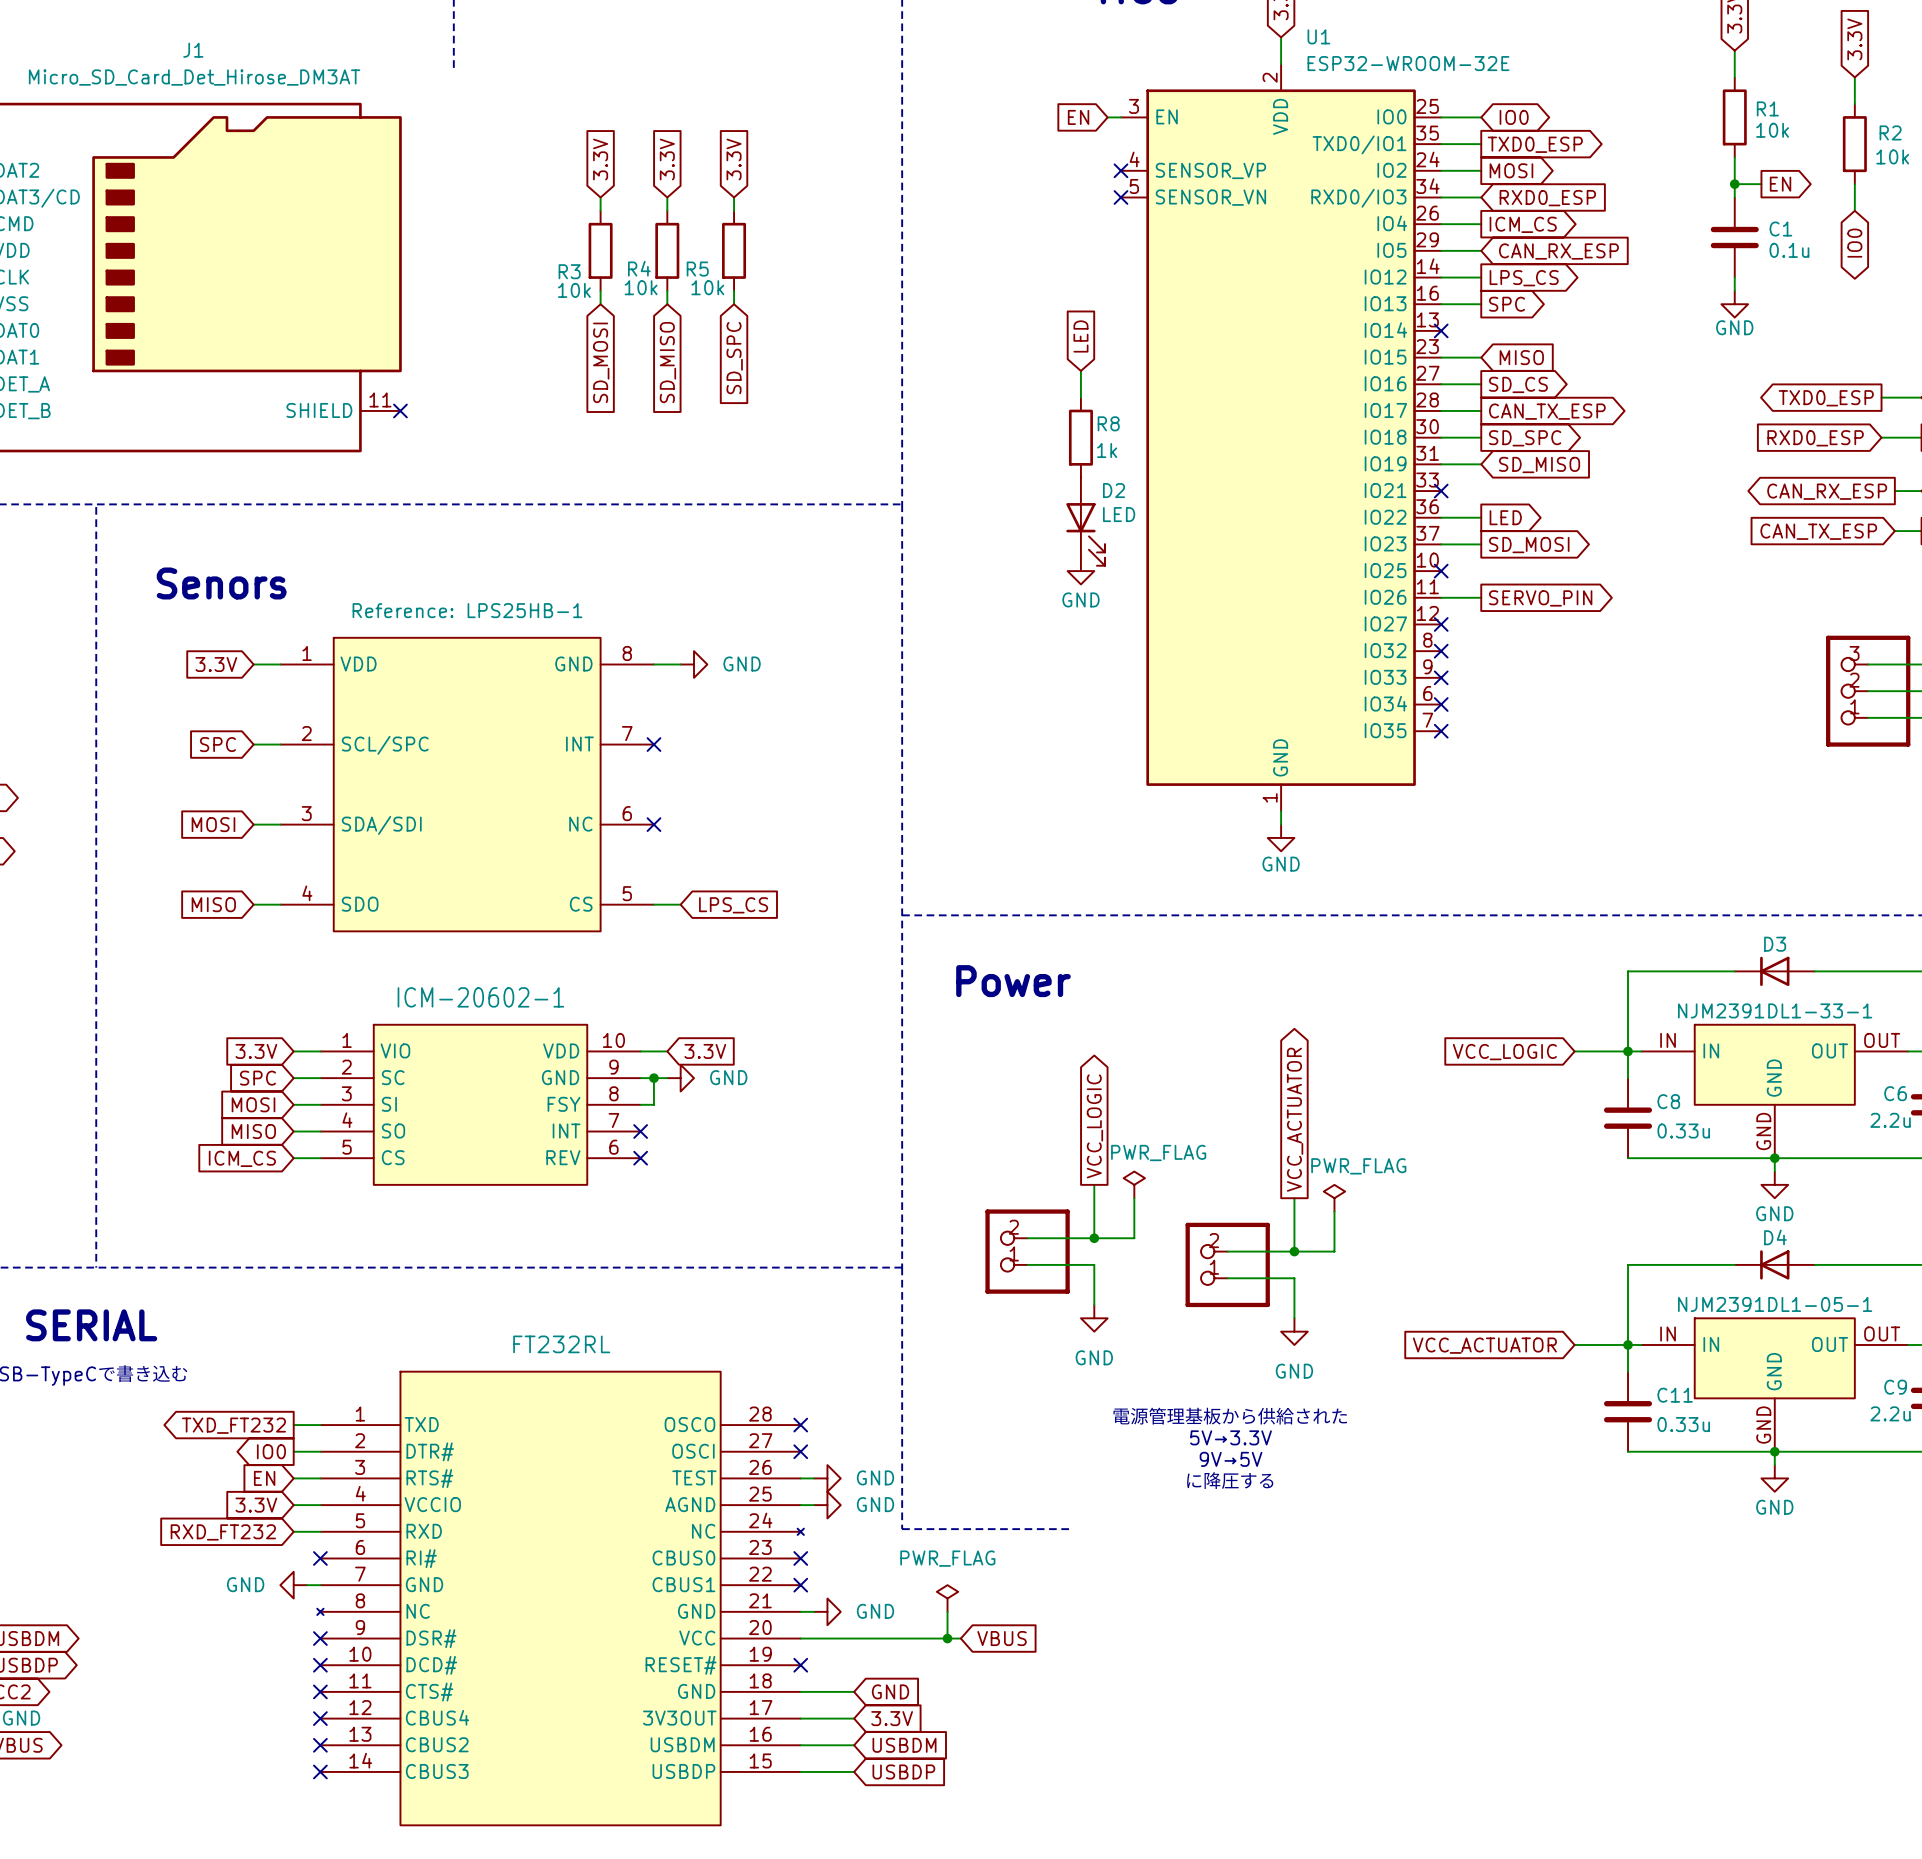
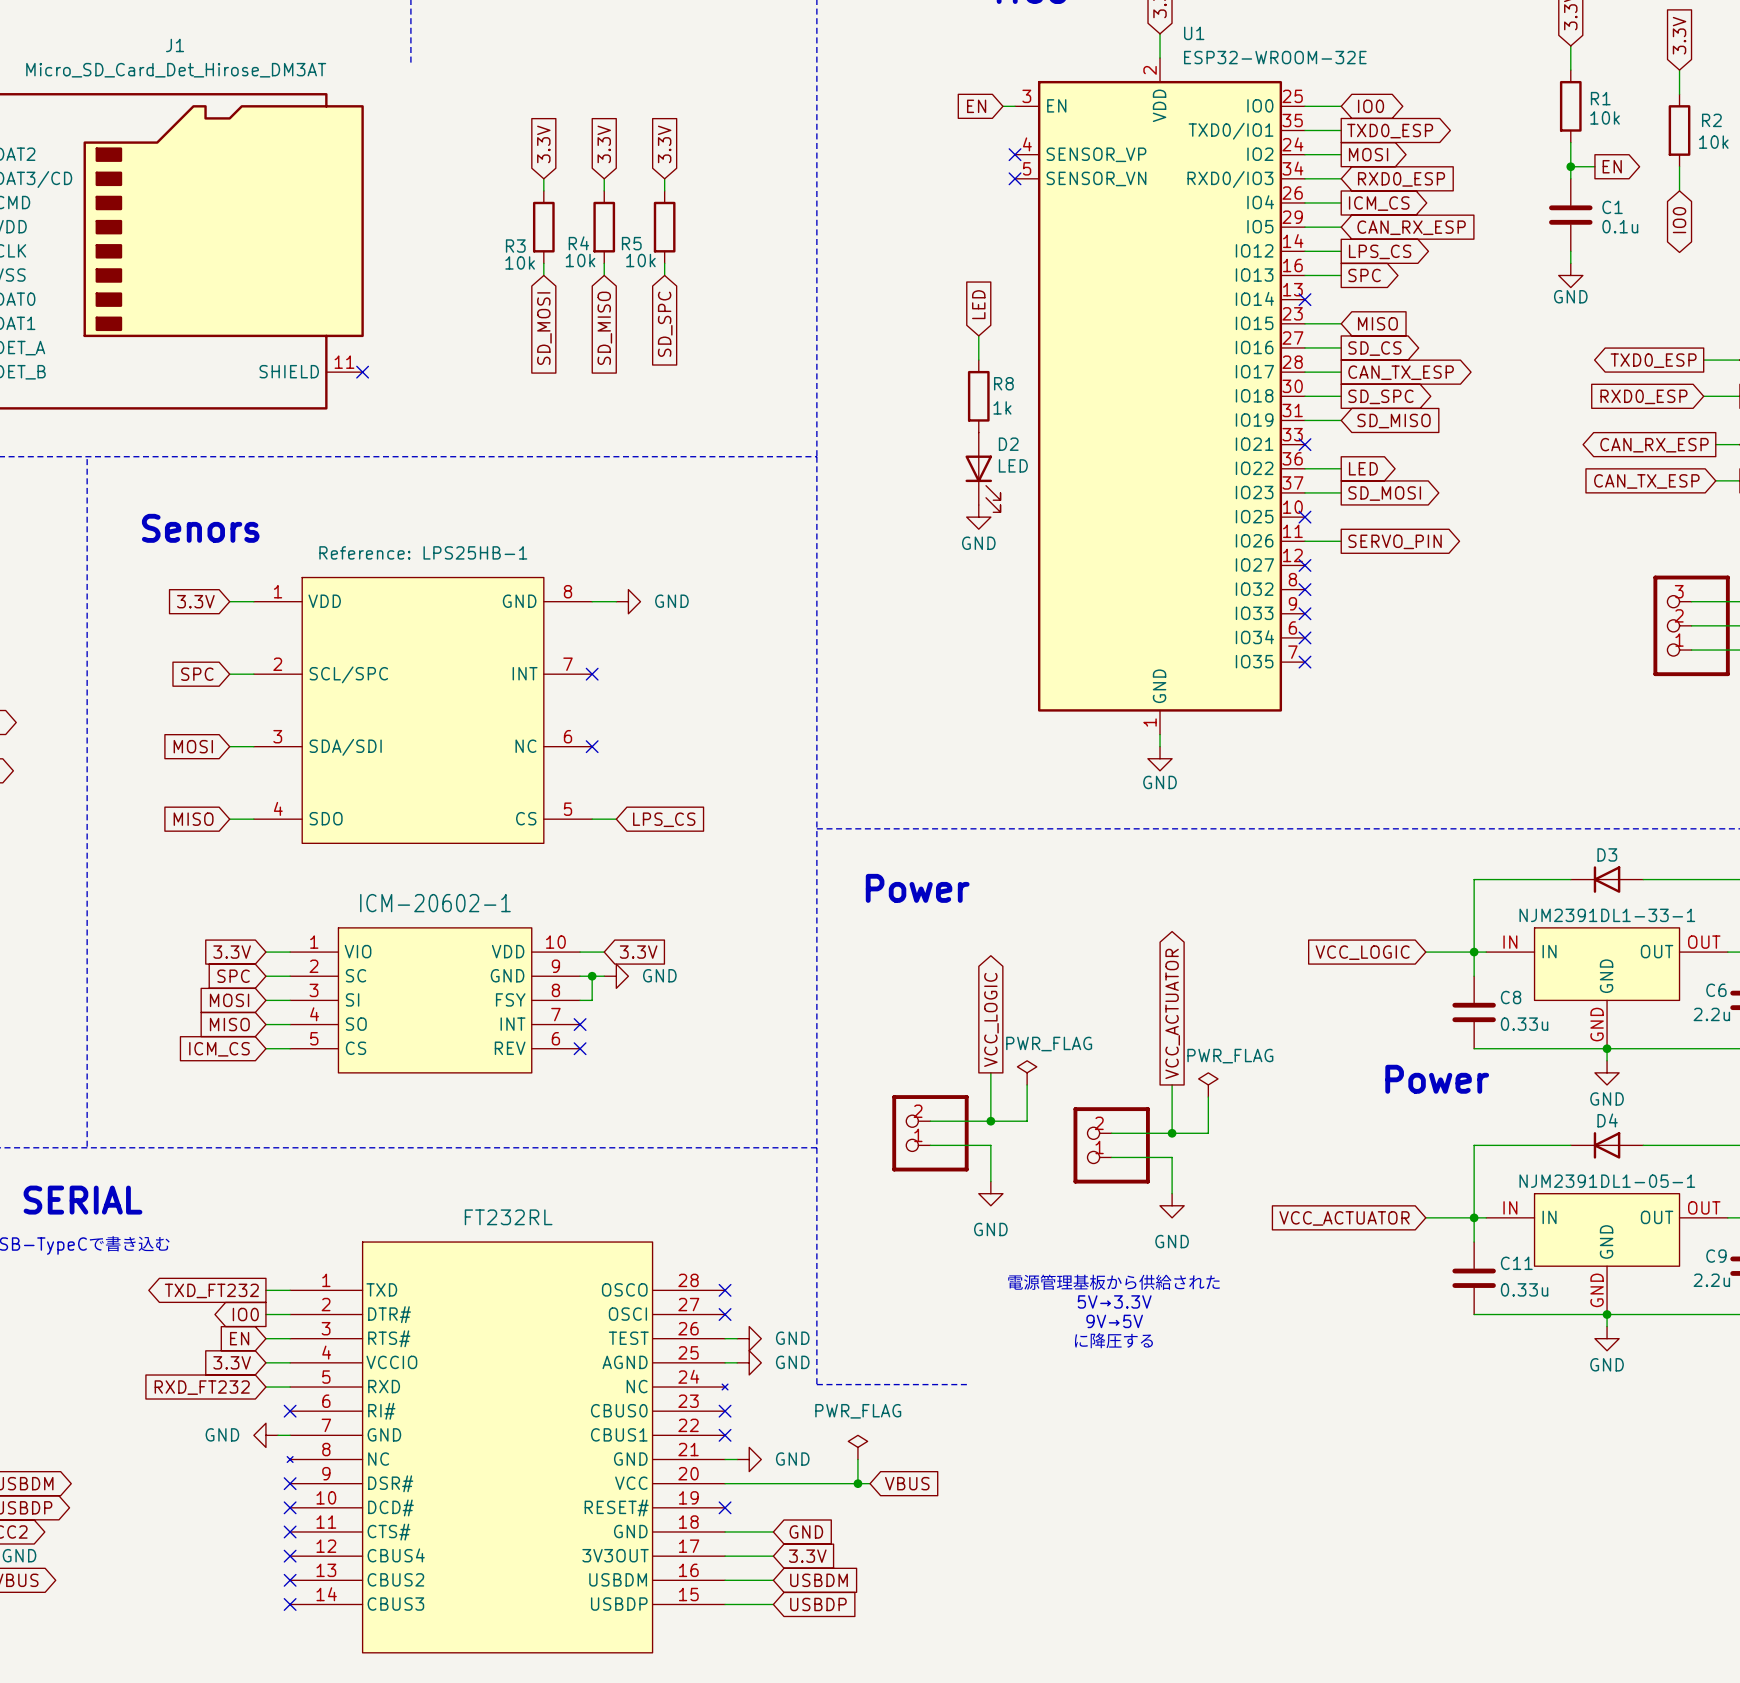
text: none -> Power (1437, 1079)

